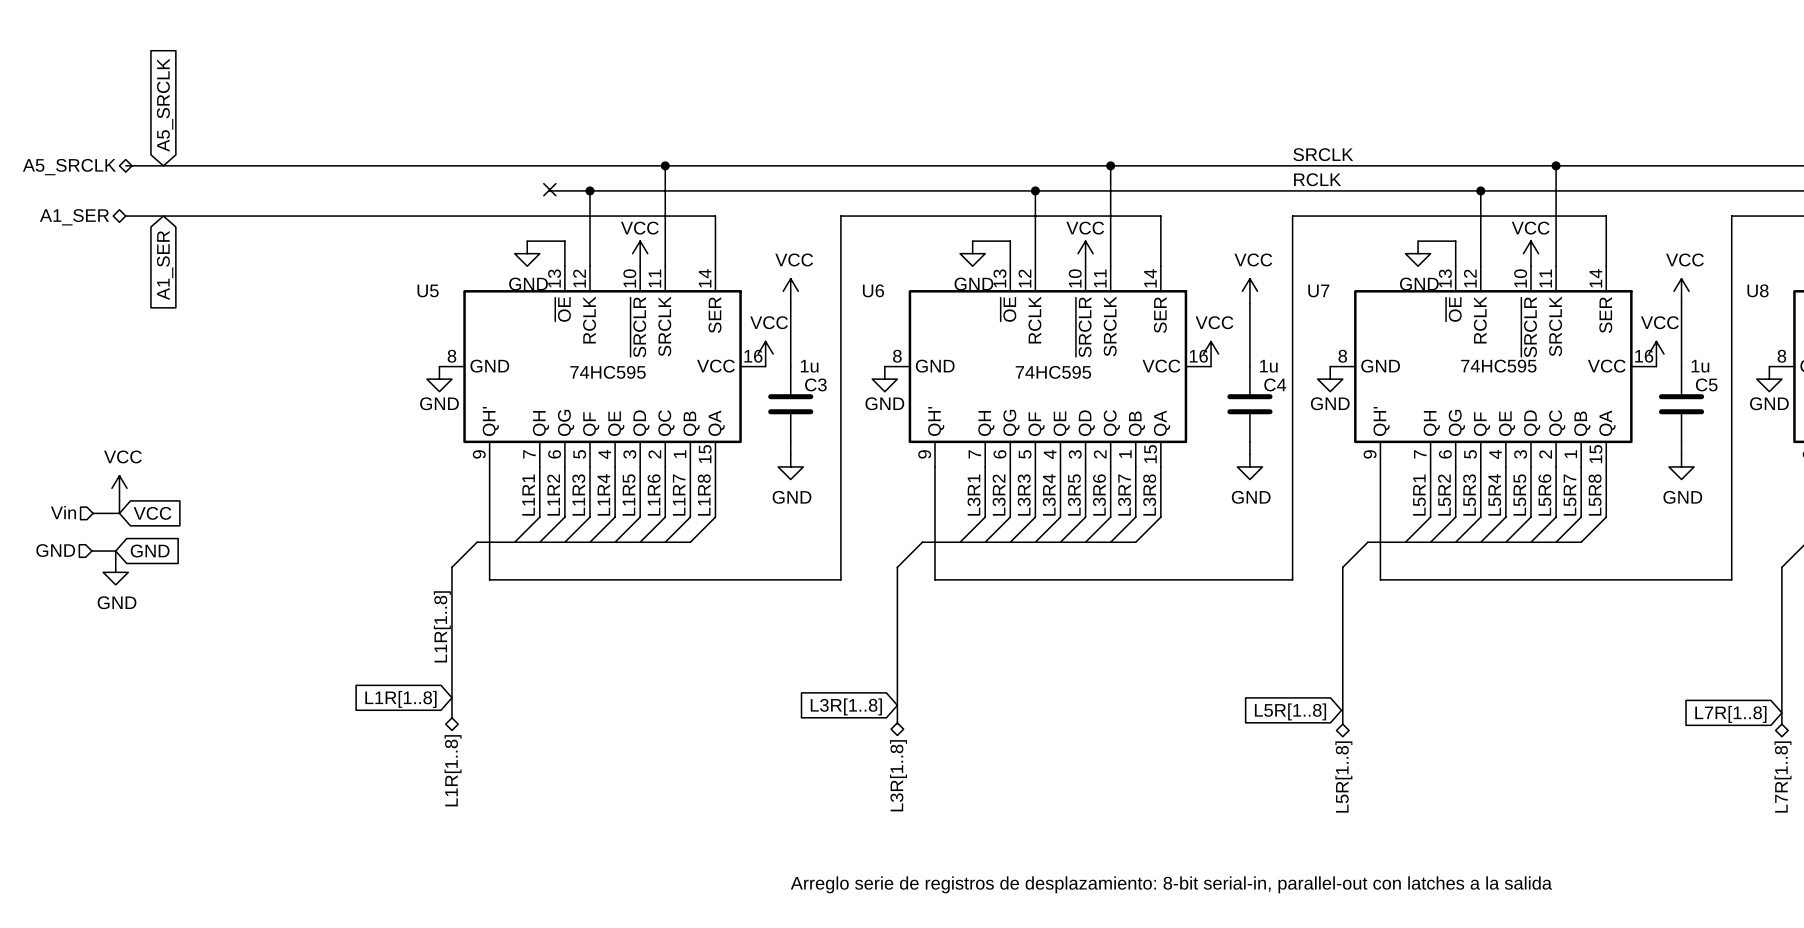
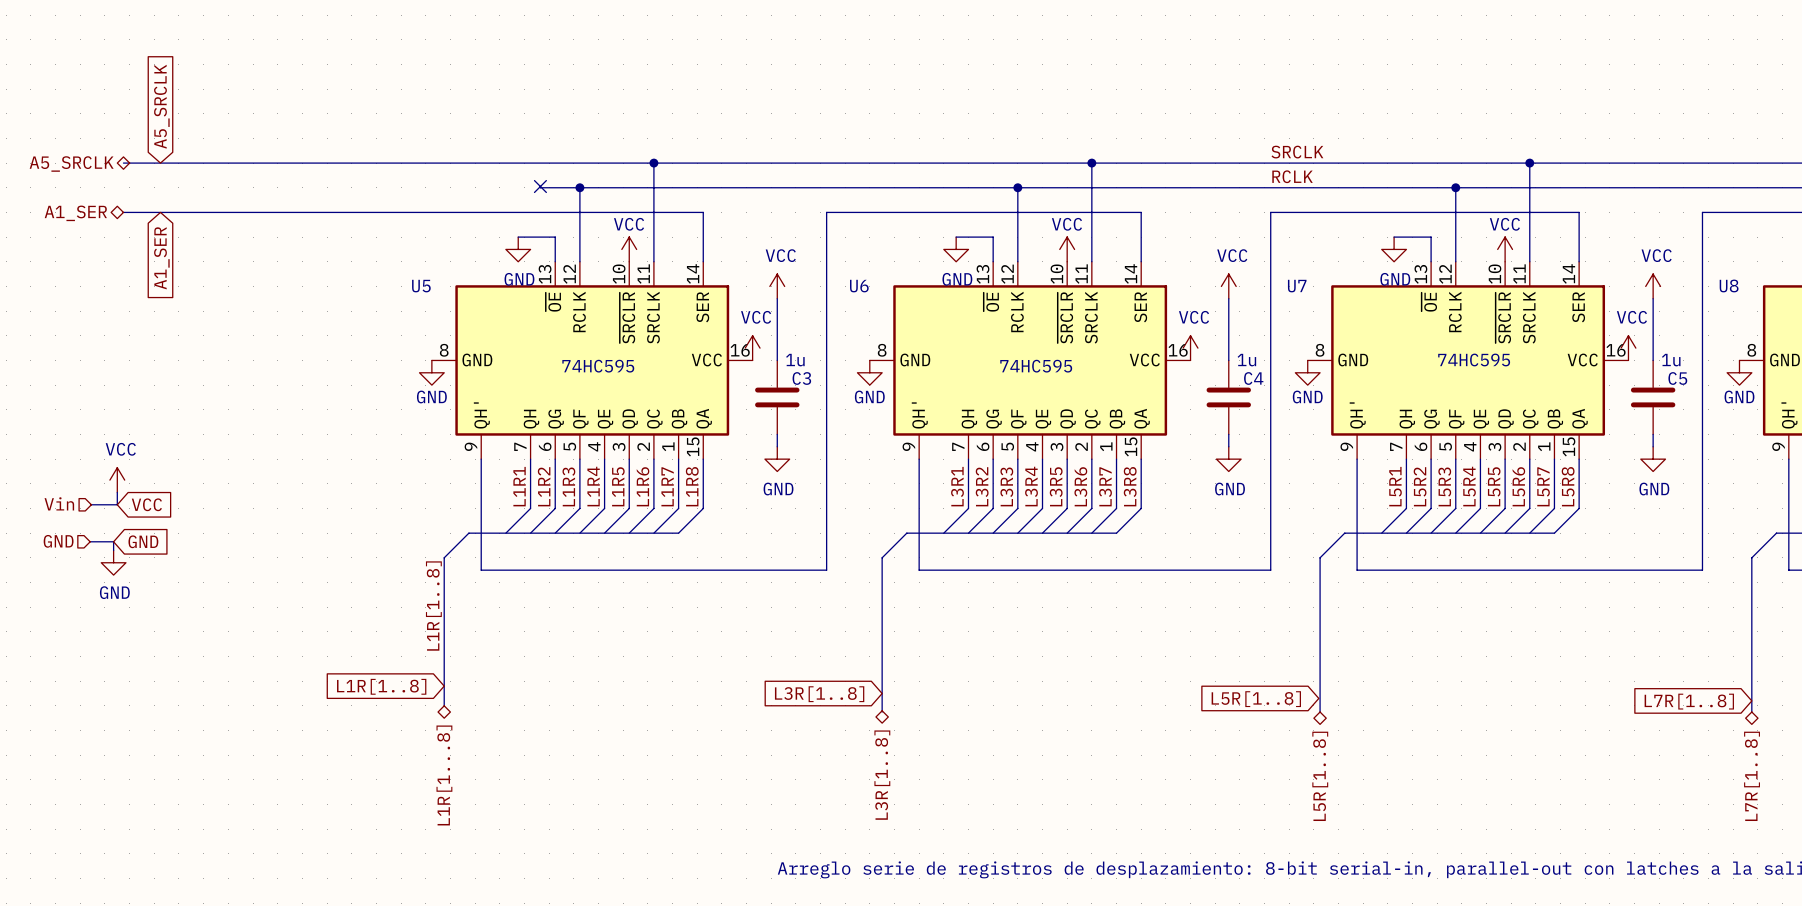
hierarchical label: L1R[1..8] (453, 770) -> L1R[1...8] (444, 775)

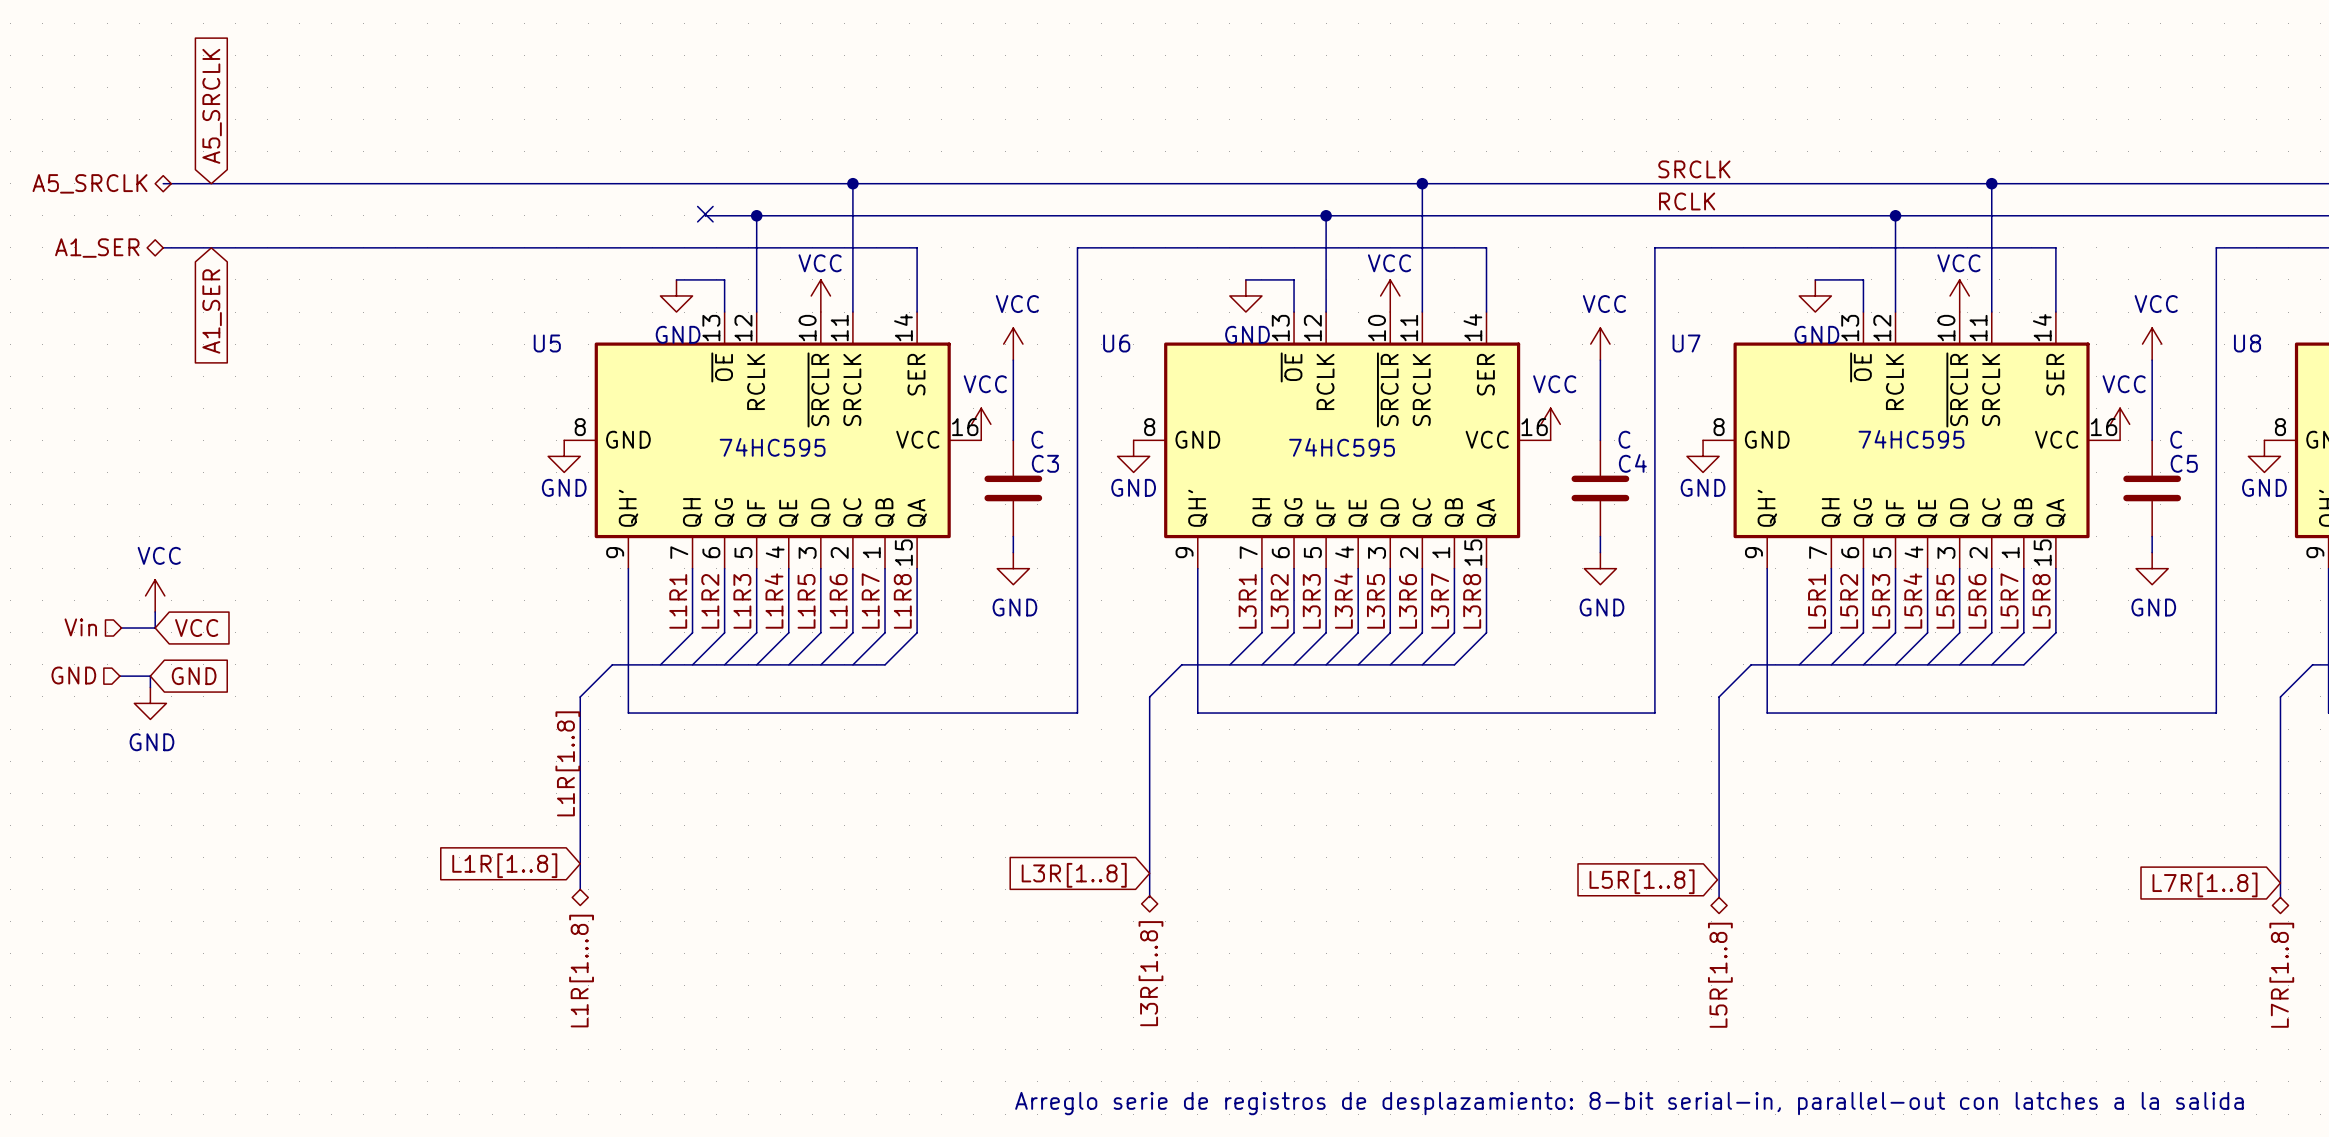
C3 value: 1u (795, 360) -> C (1037, 439)
C4 value: 1u (1246, 360) -> C (1624, 439)
C5 value: 1u (1671, 360) -> C (2176, 439)

